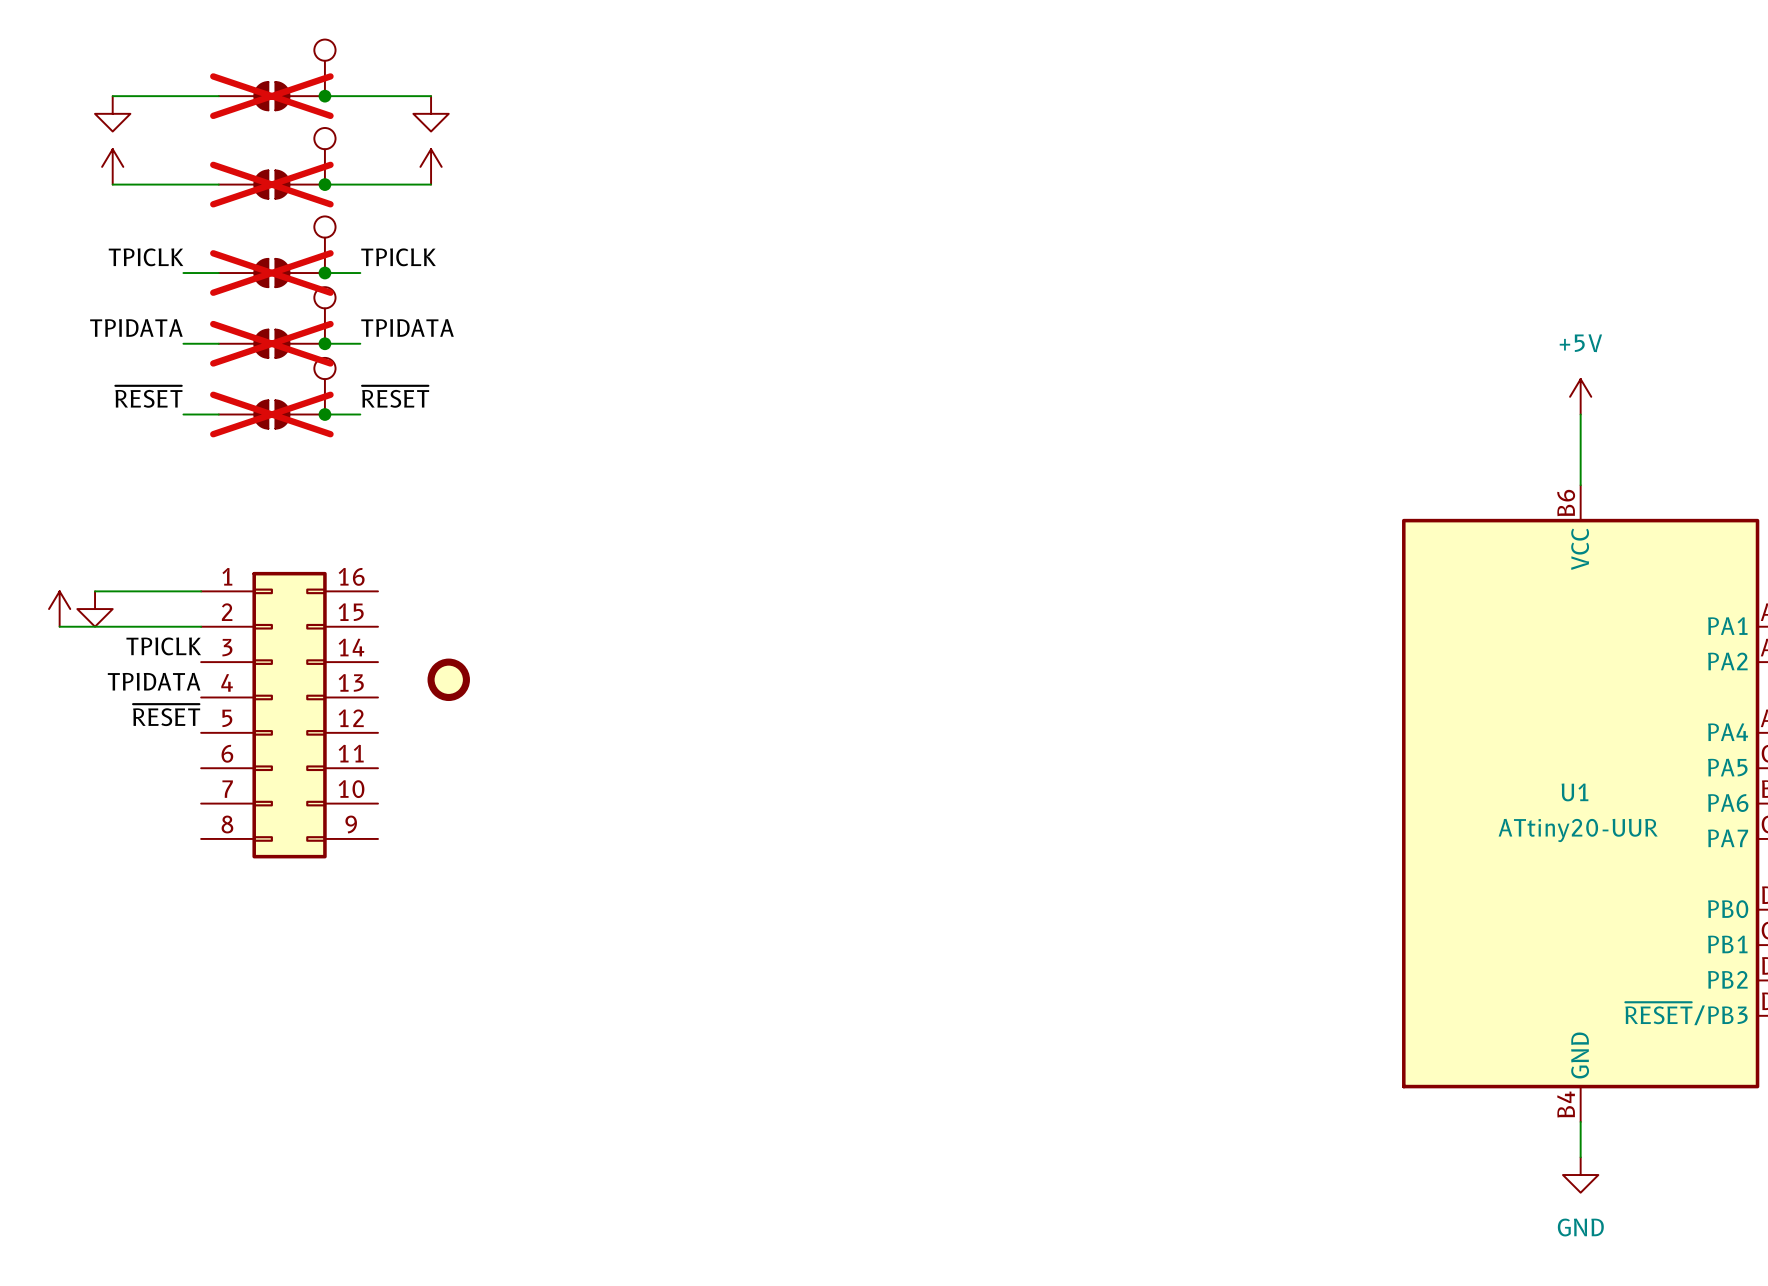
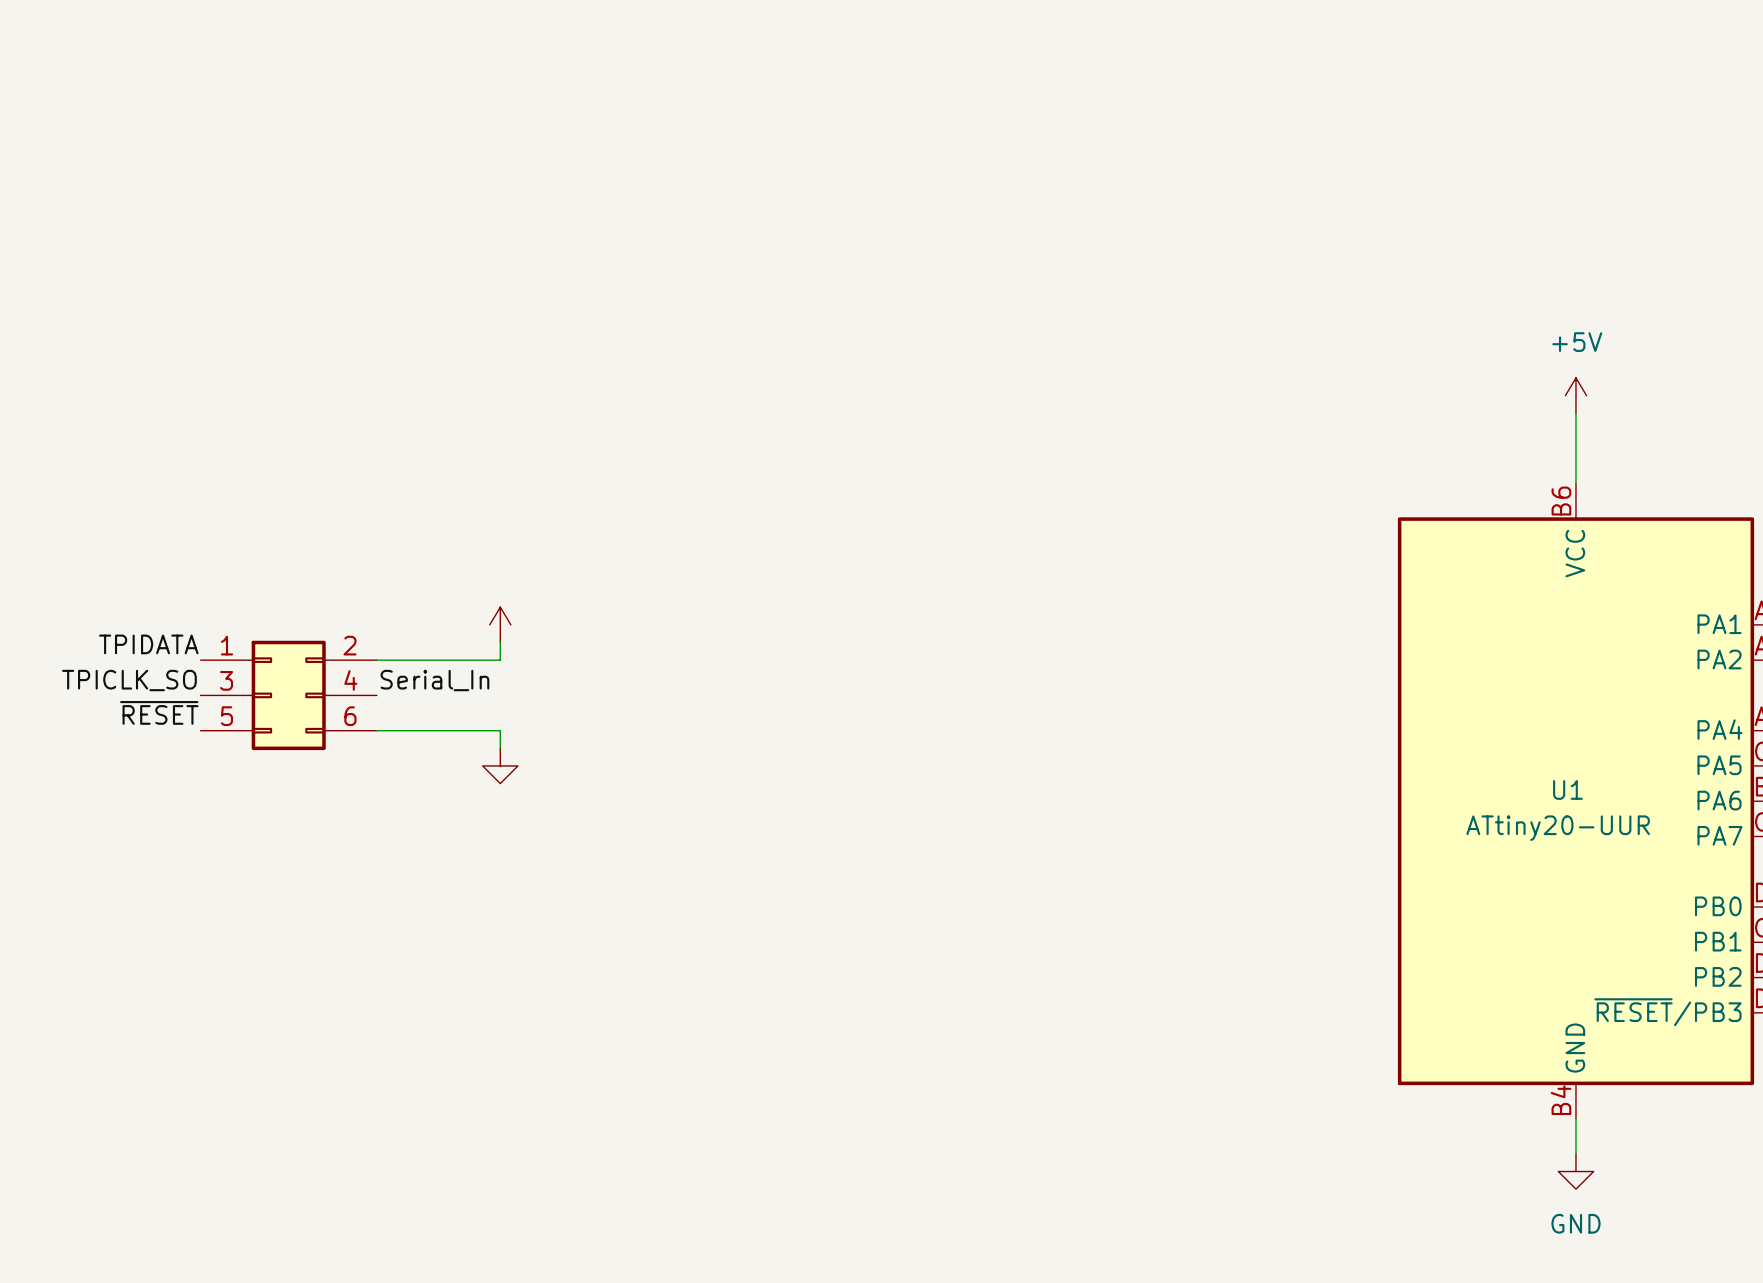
part: (324, 67) -> none
wire: (112, 96) (218, 96) -> none
part: (271, 96) -> none
wire: (324, 96) (431, 96) -> none
junction: (324, 96) -> none
power symbol: (112, 113) -> none
power symbol: (431, 113) -> none
part: (324, 156) -> none
power symbol: (112, 166) -> none
power symbol: (431, 166) -> none
wire: (112, 184) (218, 184) -> none
part: (271, 184) -> none
wire: (324, 184) (431, 184) -> none
junction: (324, 184) -> none
part: (324, 244) -> none
label: TPICLK (146, 257) -> none
label: TPICLK (398, 257) -> none
wire: (183, 273) (218, 273) -> none
part: (271, 273) -> none
wire: (324, 273) (360, 273) -> none
junction: (324, 273) -> none
part: (324, 315) -> none
label: TPIDATA (136, 327) -> none
label: TPIDATA (407, 327) -> none
wire: (183, 343) (218, 343) -> none
part: (271, 343) -> none
wire: (324, 343) (360, 343) -> none
junction: (324, 343) -> none
part: (324, 386) -> none
label: ~{RESET} (148, 396) -> none
label: ~{RESET} (395, 396) -> none
wire: (183, 414) (218, 414) -> none
part: (271, 414) -> none
wire: (324, 414) (360, 414) -> none
junction: (324, 414) -> none
wire: (95, 591) (201, 591) -> none
power symbol: (59, 609) -> none
power symbol: (95, 609) -> none
wire: (59, 626) (201, 626) -> none
power symbol: none -> (500, 624)
wire: none -> (500, 642) (500, 660) (376, 660)
label: TPICLK (163, 646) -> TPIDATA (148, 644)
part: (448, 679) -> none
label: TPIDATA (154, 681) -> TPICLK_SO (129, 680)
label: none -> Serial_In (434, 680)
part: none -> (288, 695)
part: (289, 715) -> none
wire: none -> (376, 730) (500, 730) (500, 748)
power symbol: none -> (500, 765)

